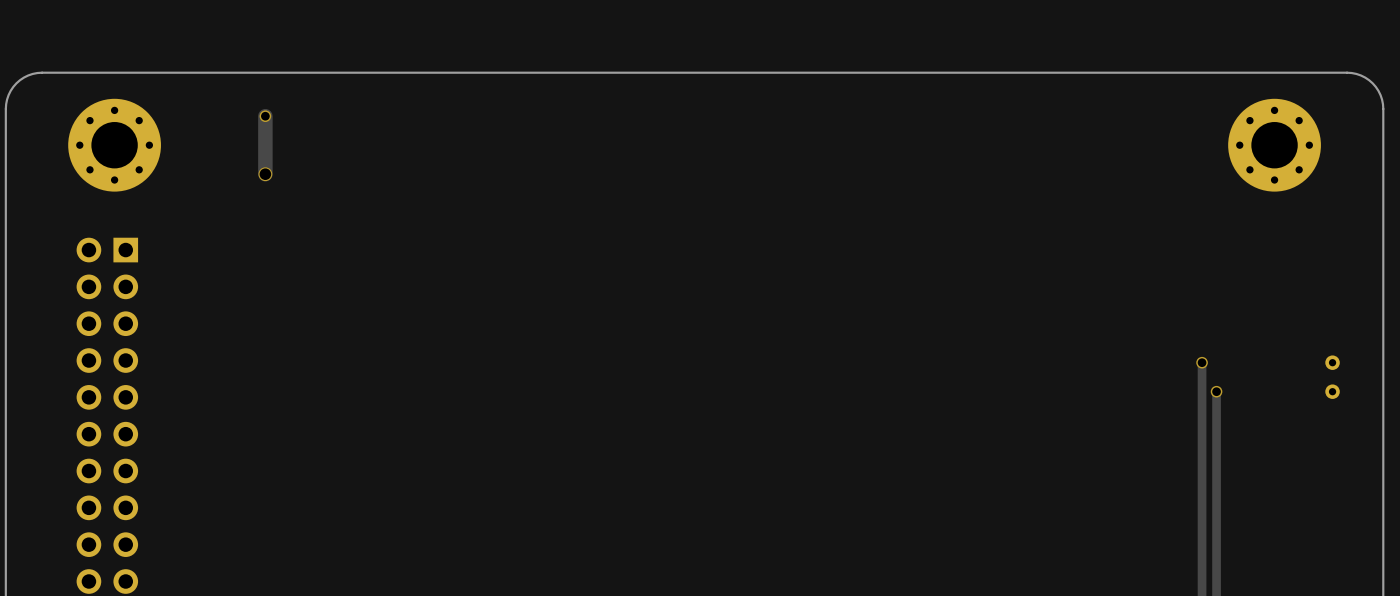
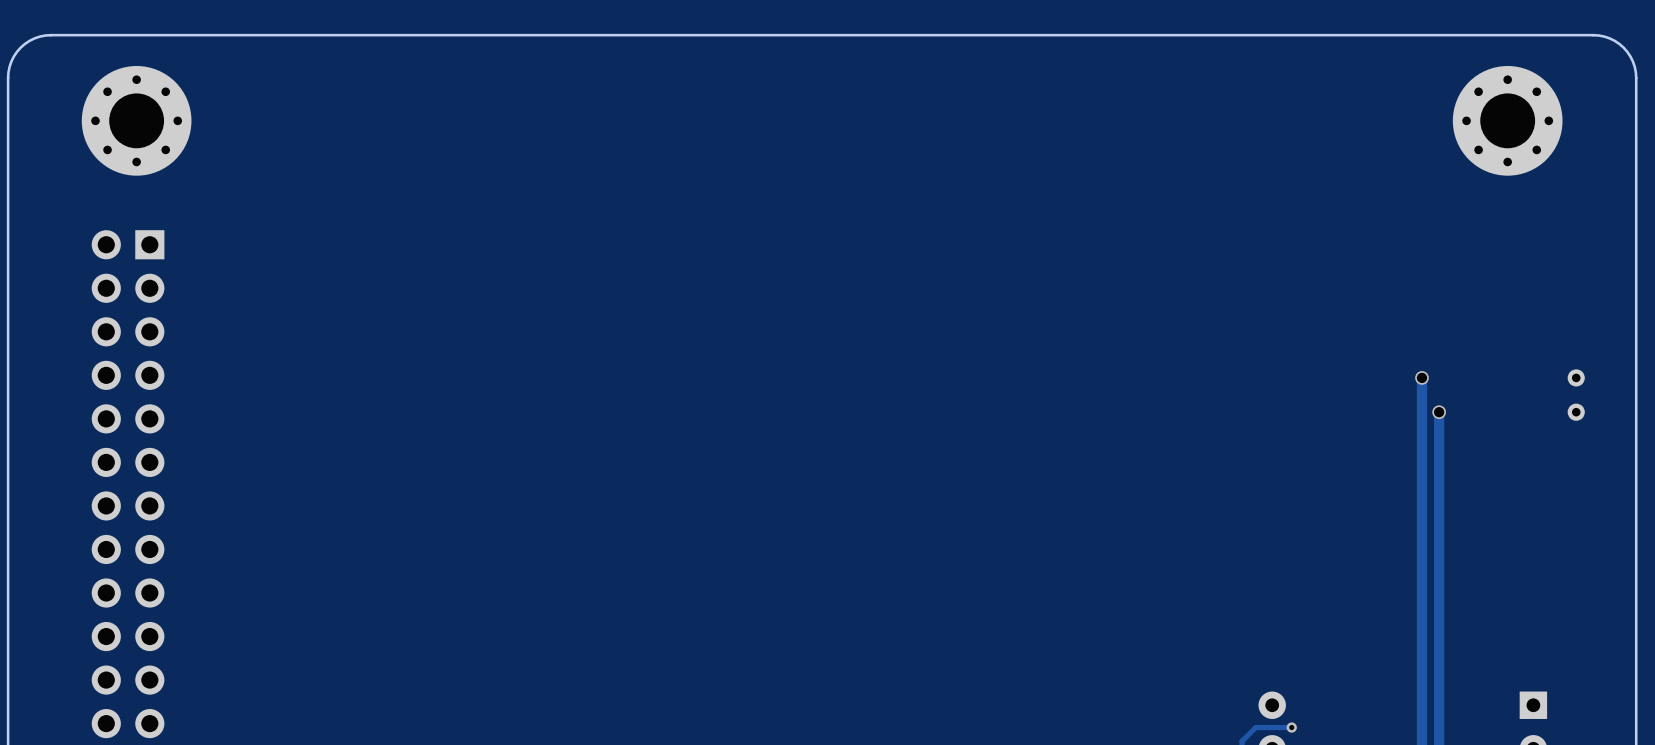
track: (265, 116) (265, 174) -> none
via: (265, 116) -> none
via: (265, 174) -> none

